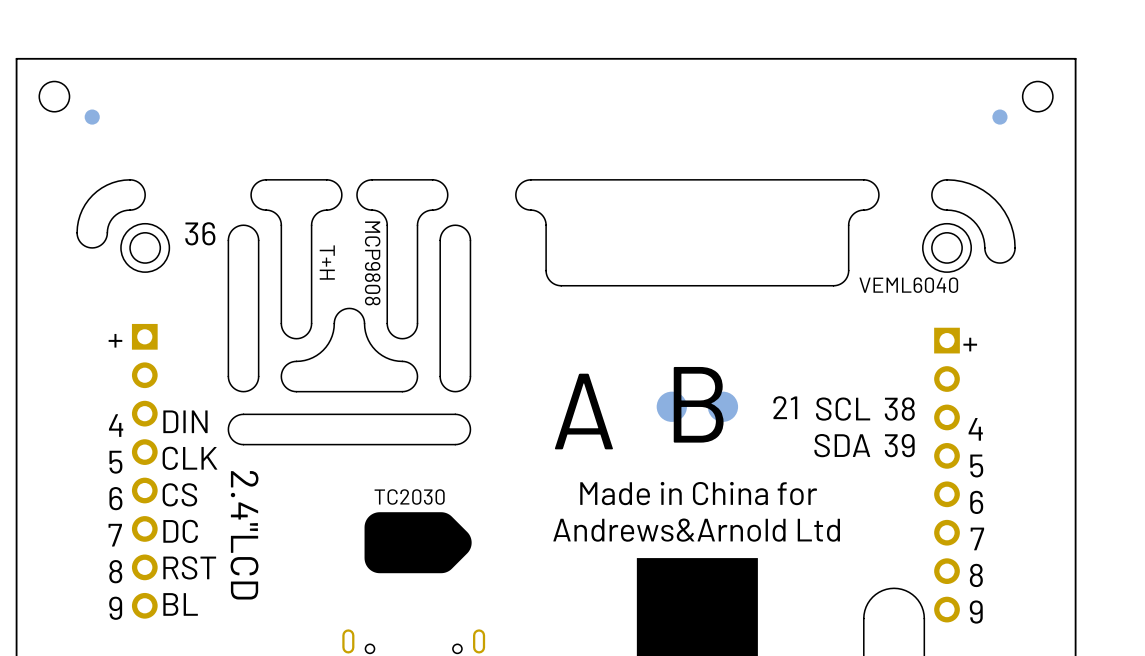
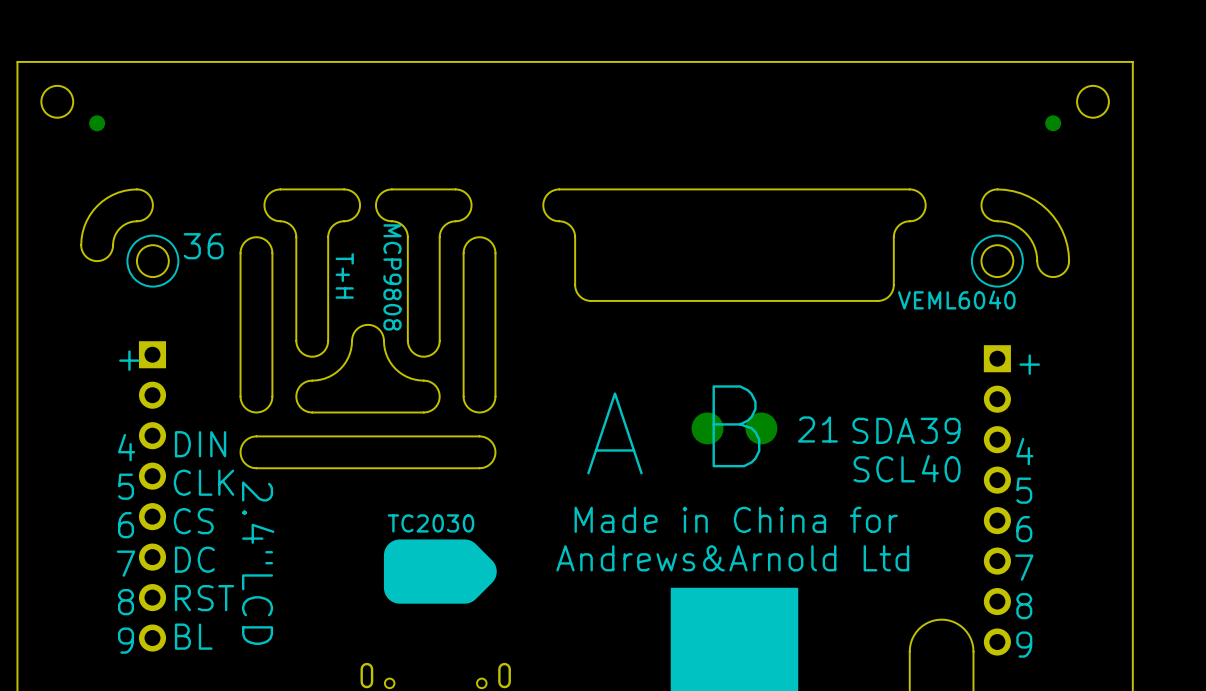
text: SCL (843, 409) -> SDA (883, 430)
text: 38 (899, 409) -> 39 (940, 430)
text: SDA (842, 445) -> SCL (884, 469)
text: 39 (899, 445) -> 40 (941, 468)

